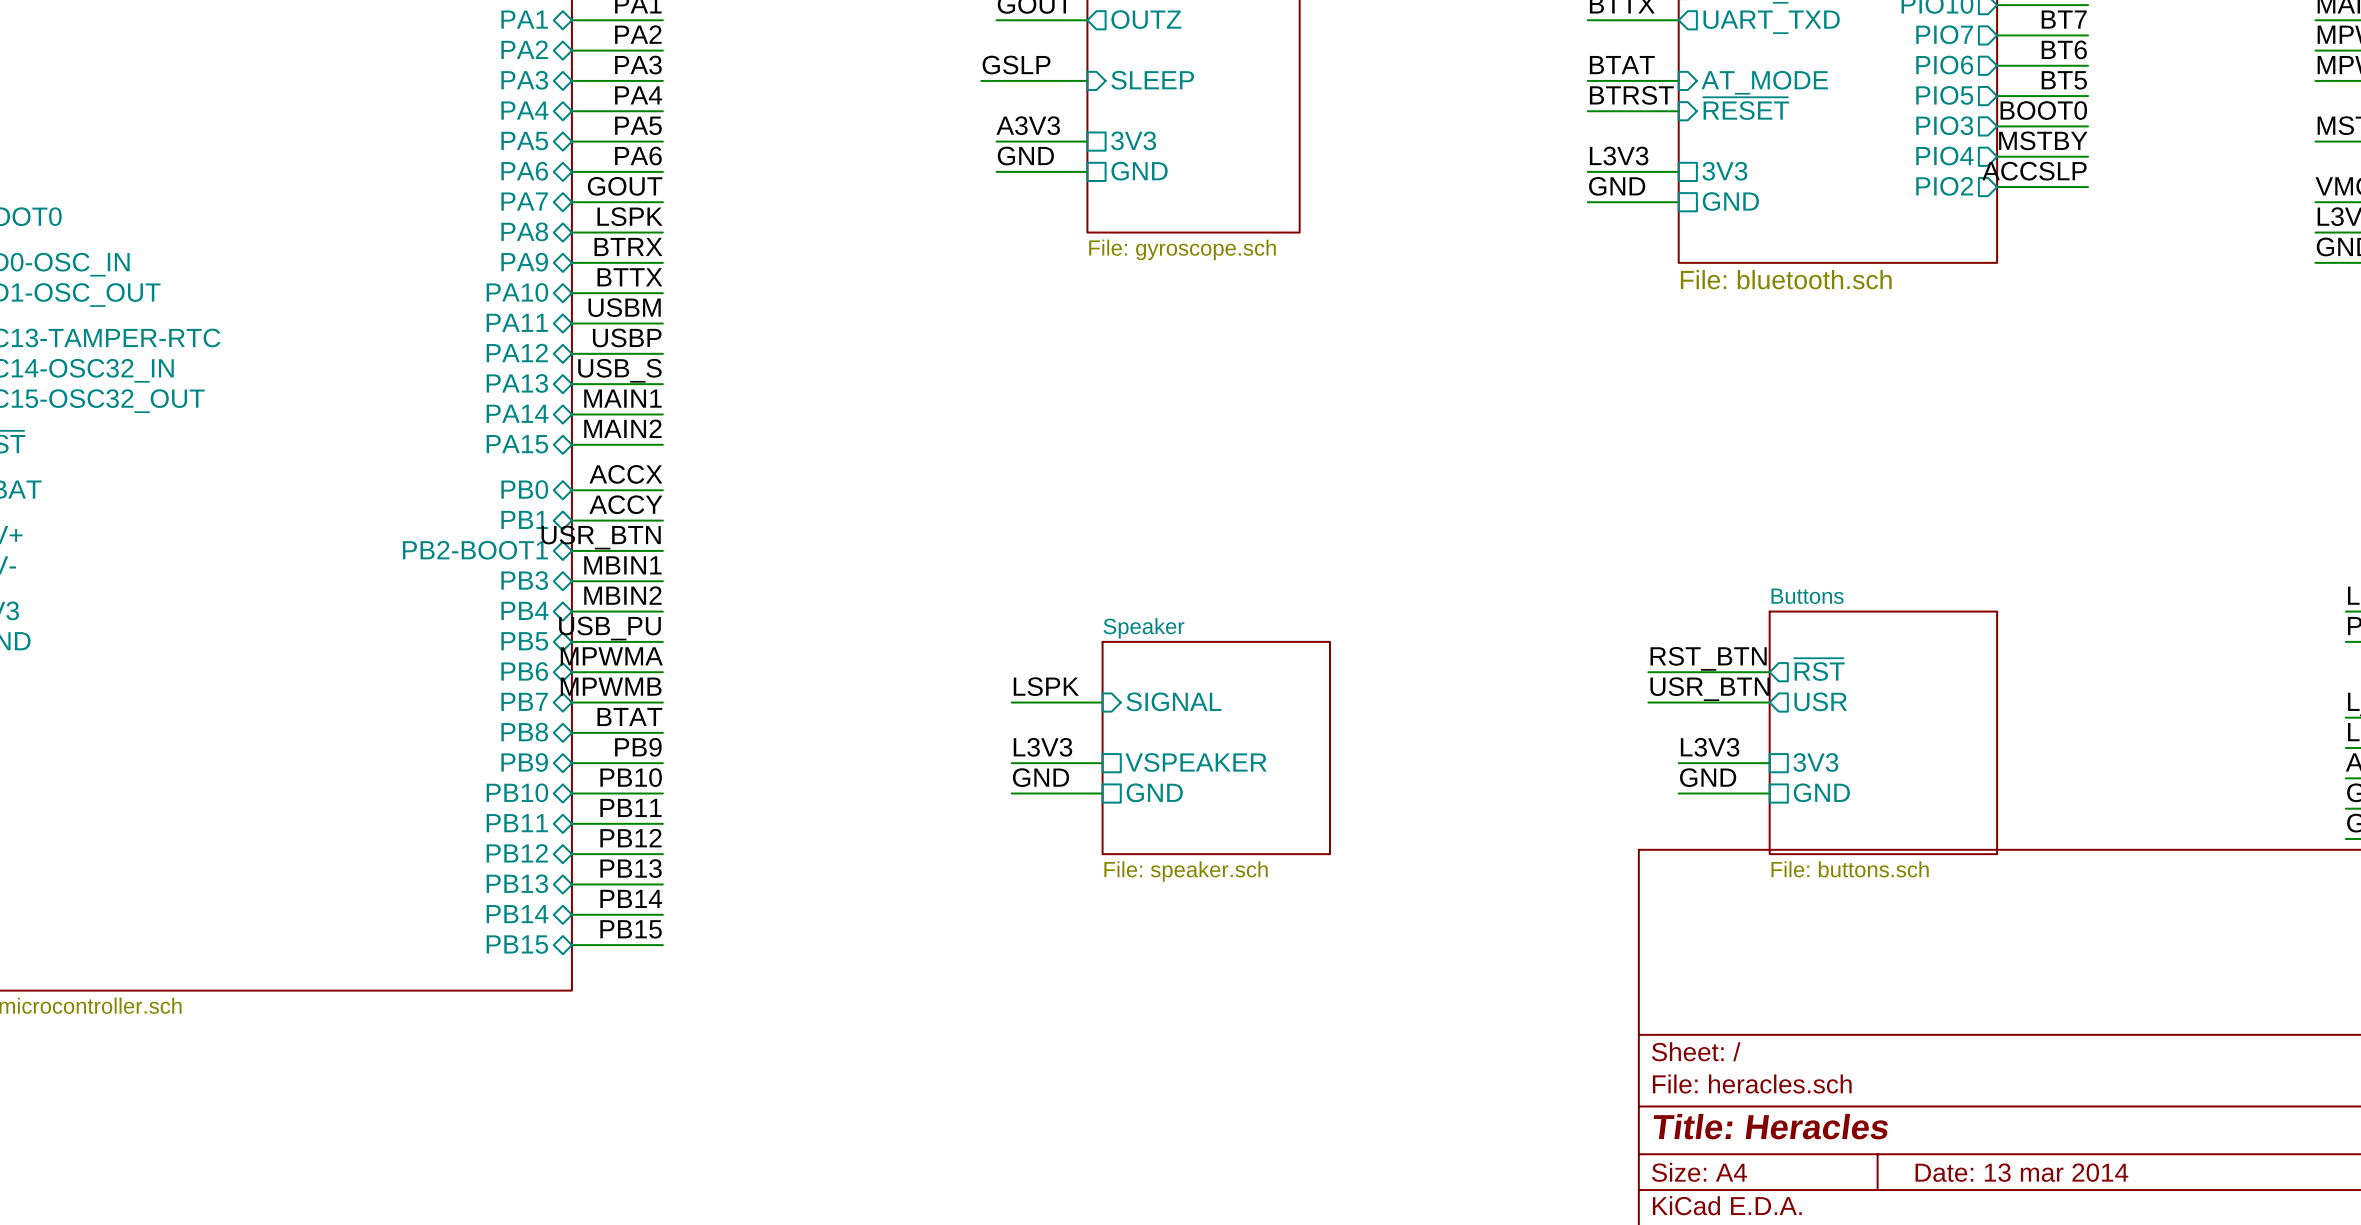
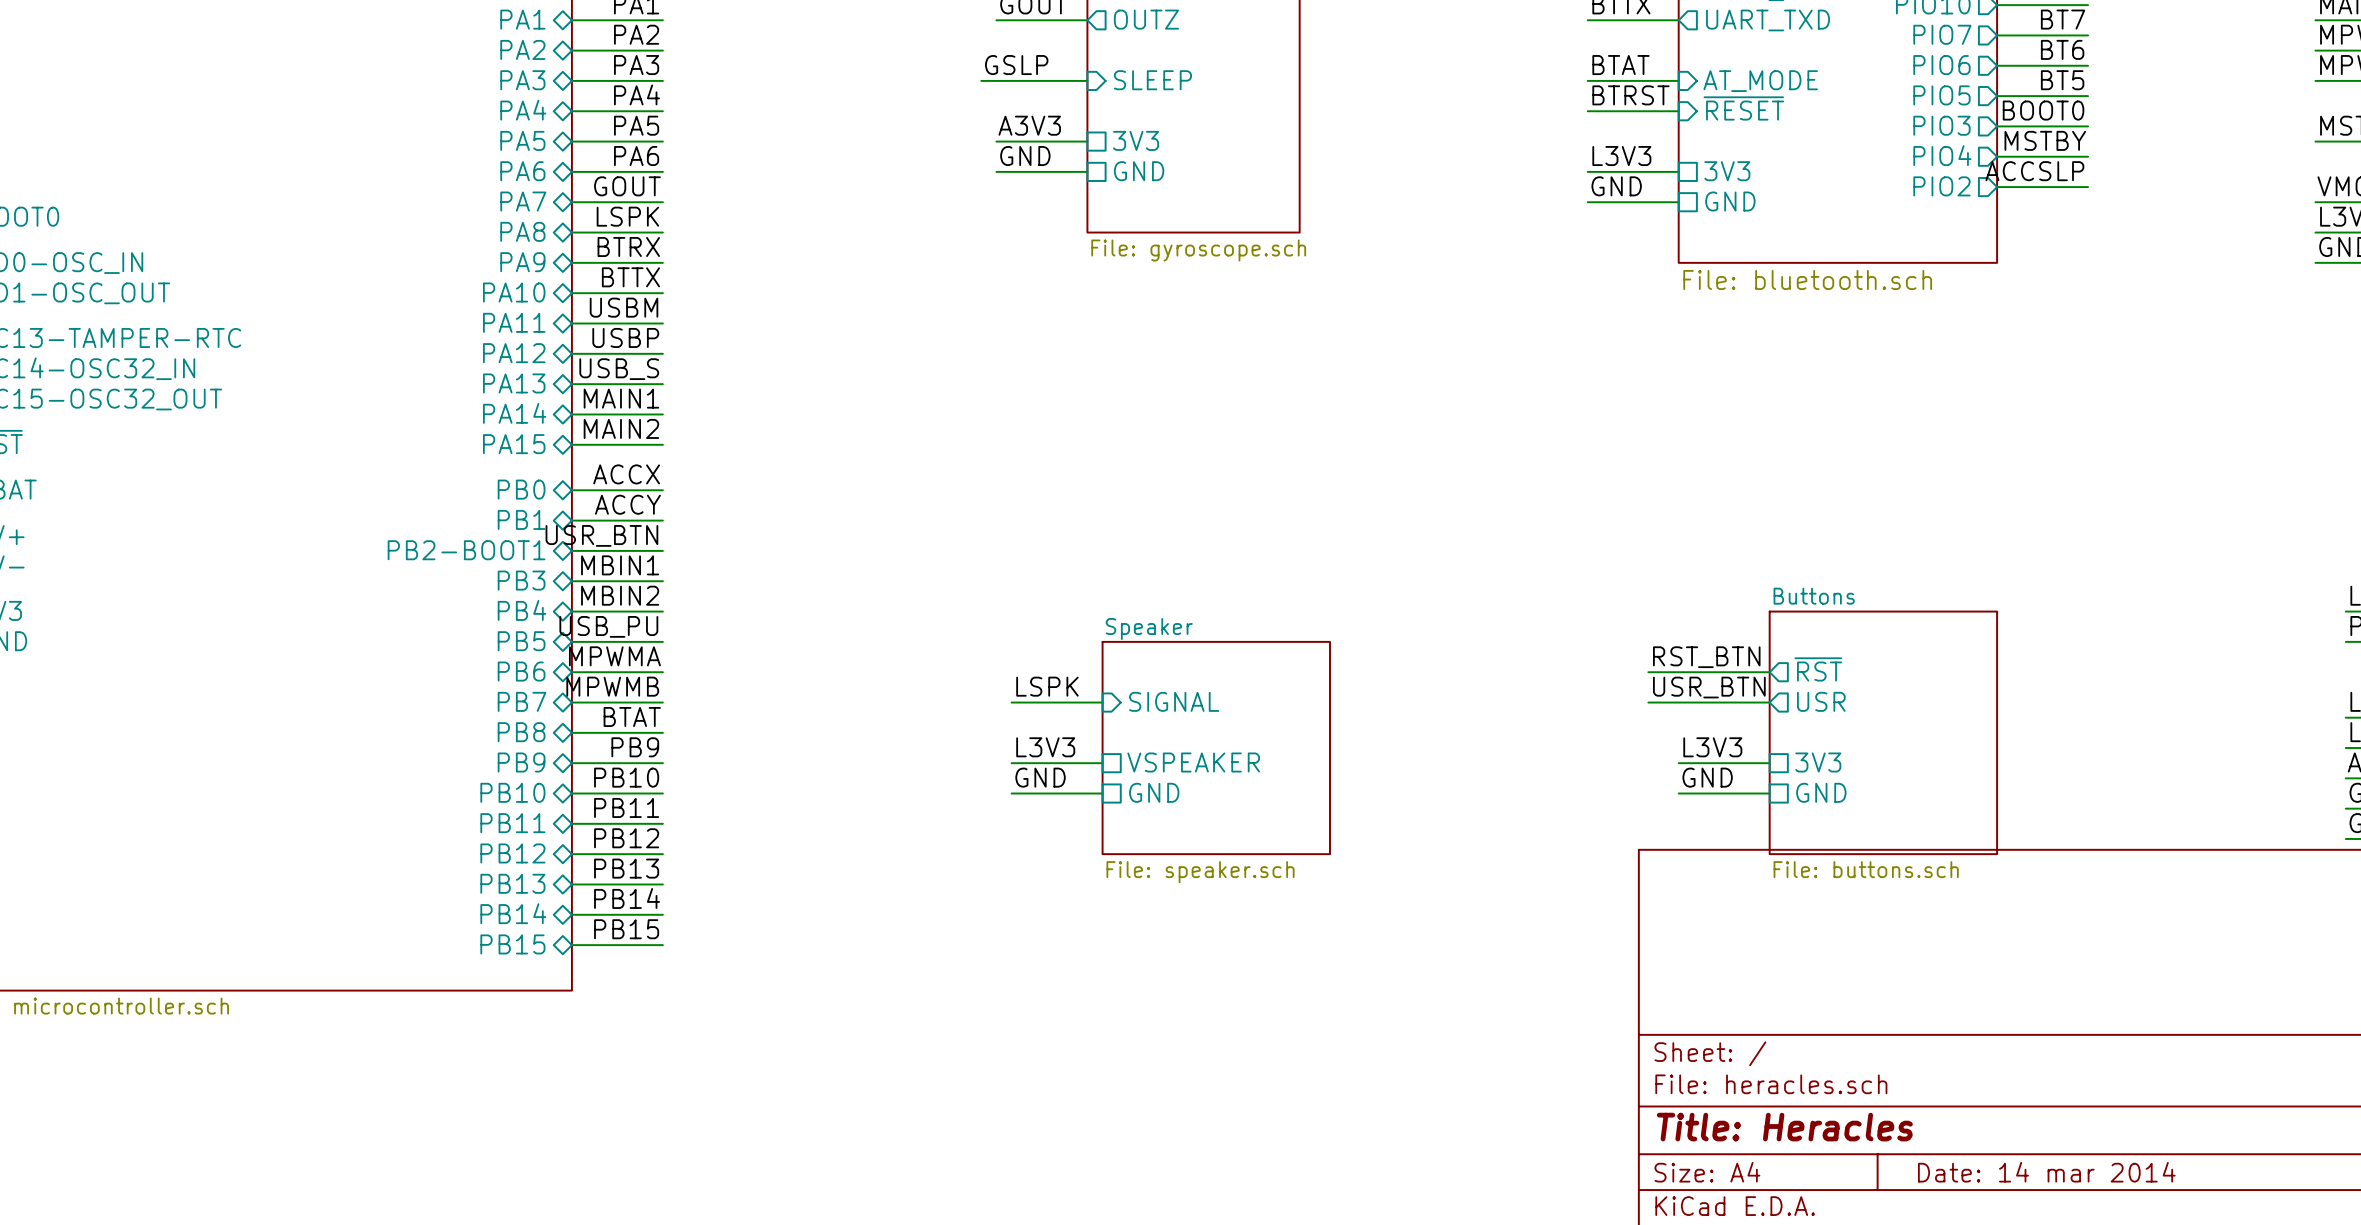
title block: Date: 13 mar 2014 (2021, 1172) -> Date: 14 mar 2014 (2046, 1172)

